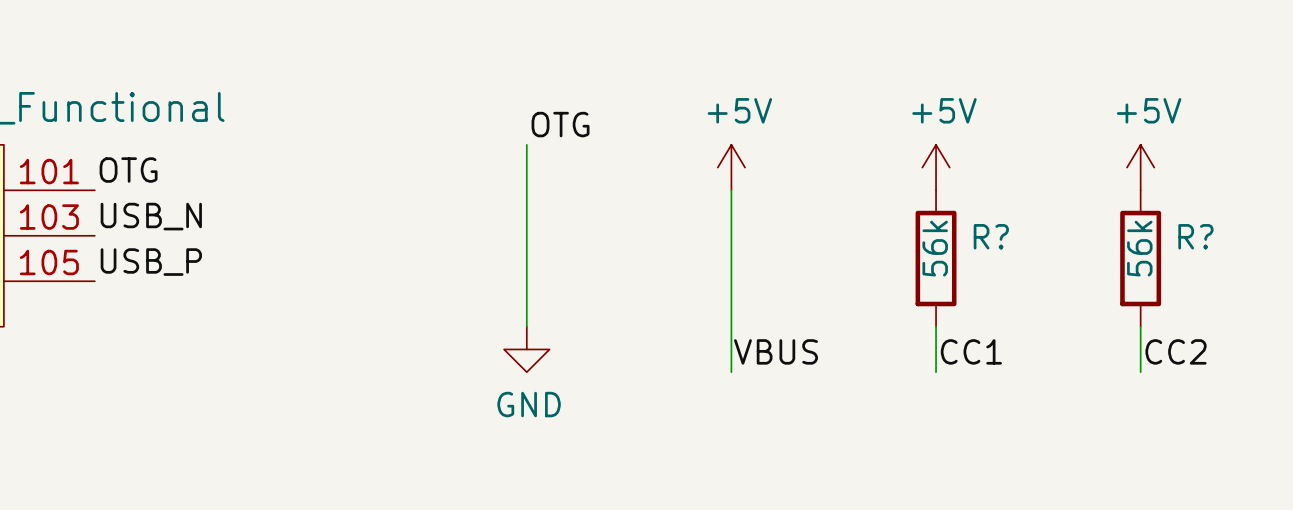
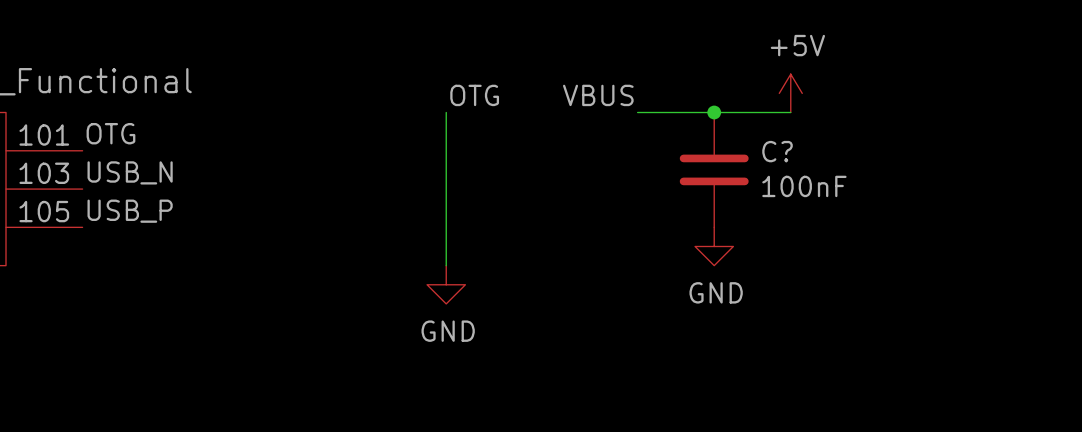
wire: none -> (637, 112) (790, 112)
junction: none -> (714, 112)
power symbol: +5V (731, 167) -> none
power symbol position: +5V (936, 167) -> +5V (790, 93)
power symbol: +5V (1140, 167) -> none
wire: (731, 190) (731, 372) -> none
C?: none -> 100nF (714, 169)
R?: 56k (936, 258) -> none
R?: 56k (1140, 258) -> none
power symbol: none -> GND (714, 246)
wire: (936, 326) (936, 372) -> none
wire: (1140, 326) (1140, 372) -> none
label position: VBUS (775, 351) -> VBUS (598, 95)
label: CC1 (971, 351) -> none
label: CC2 (1176, 351) -> none

